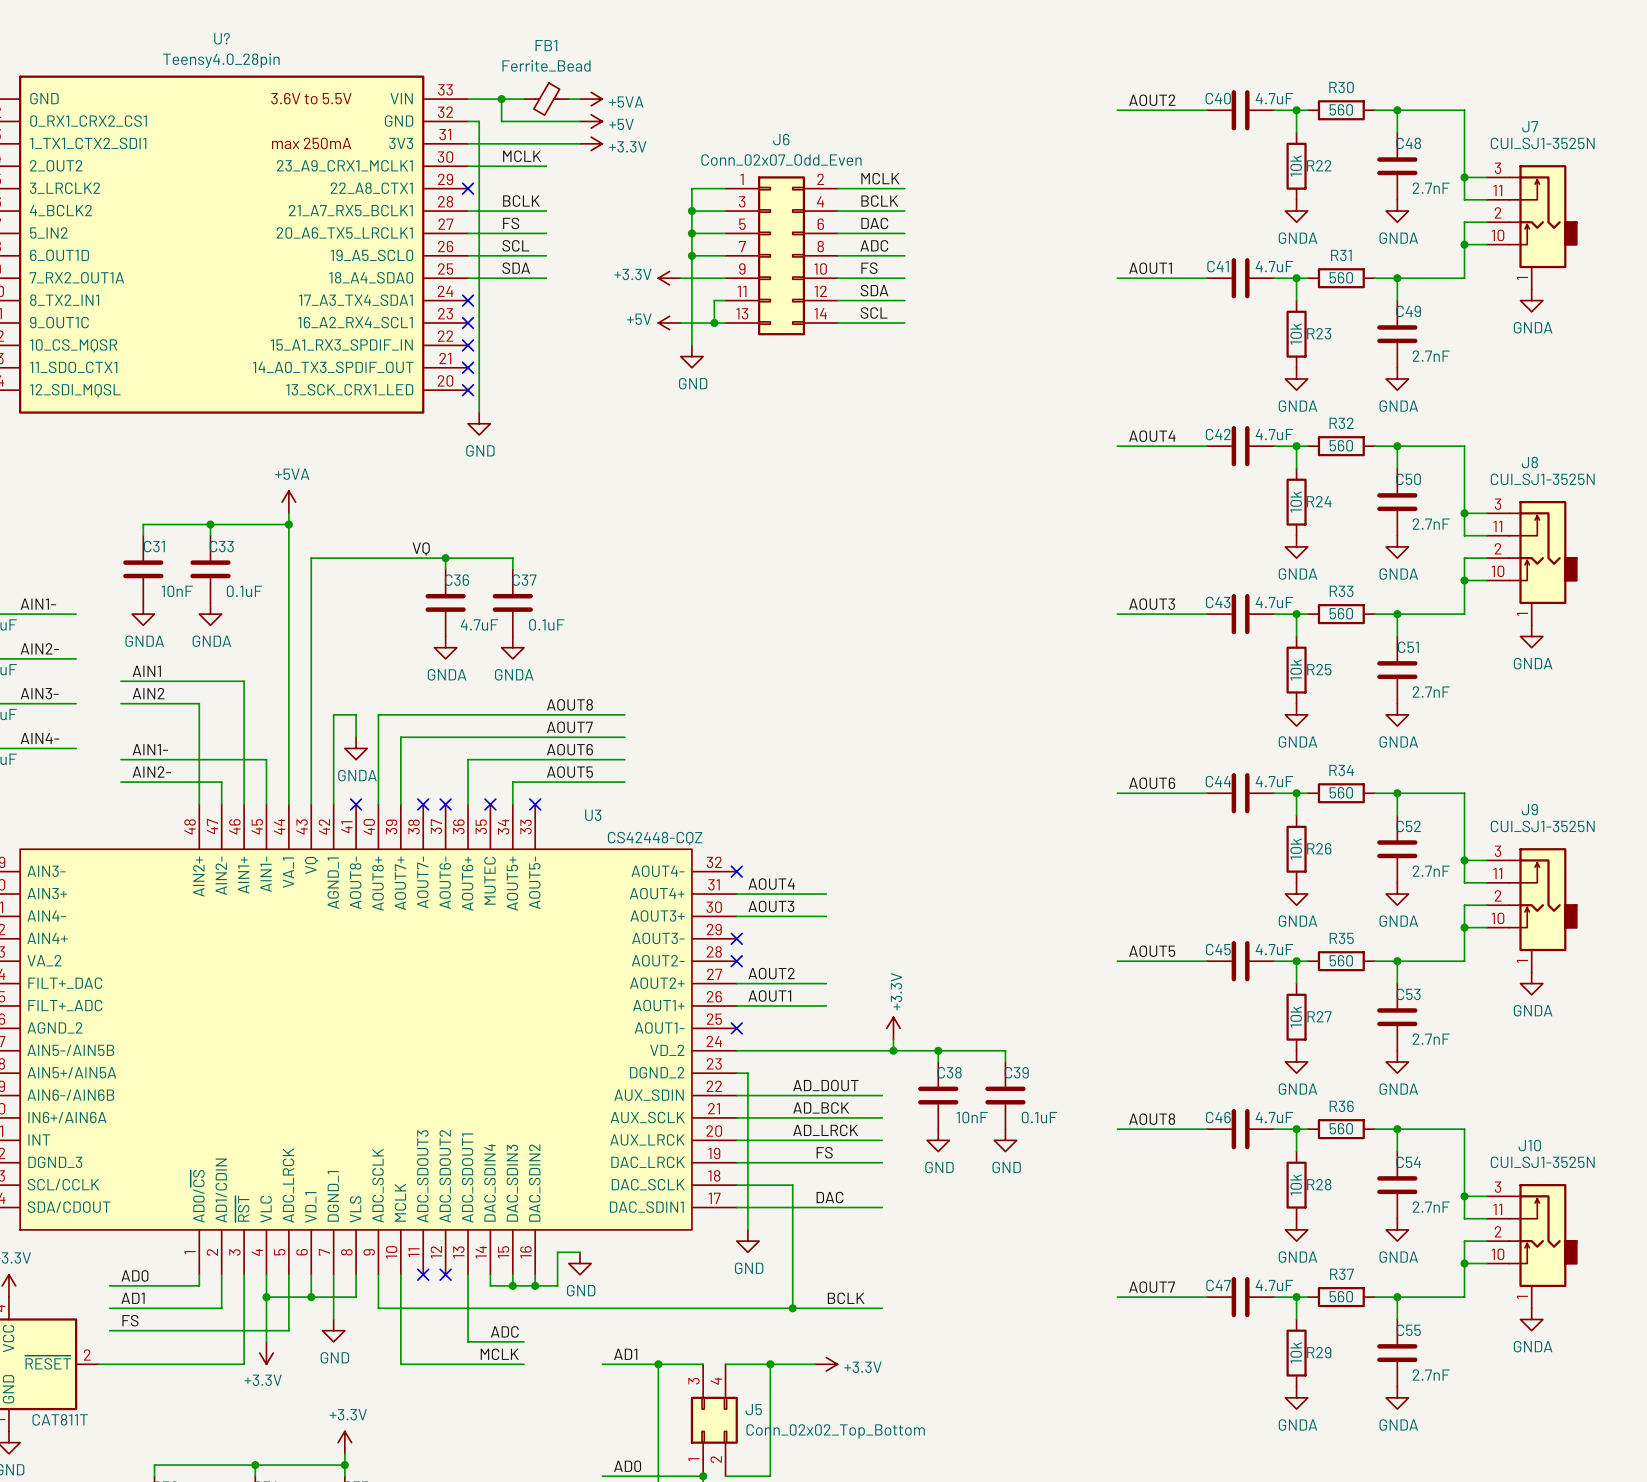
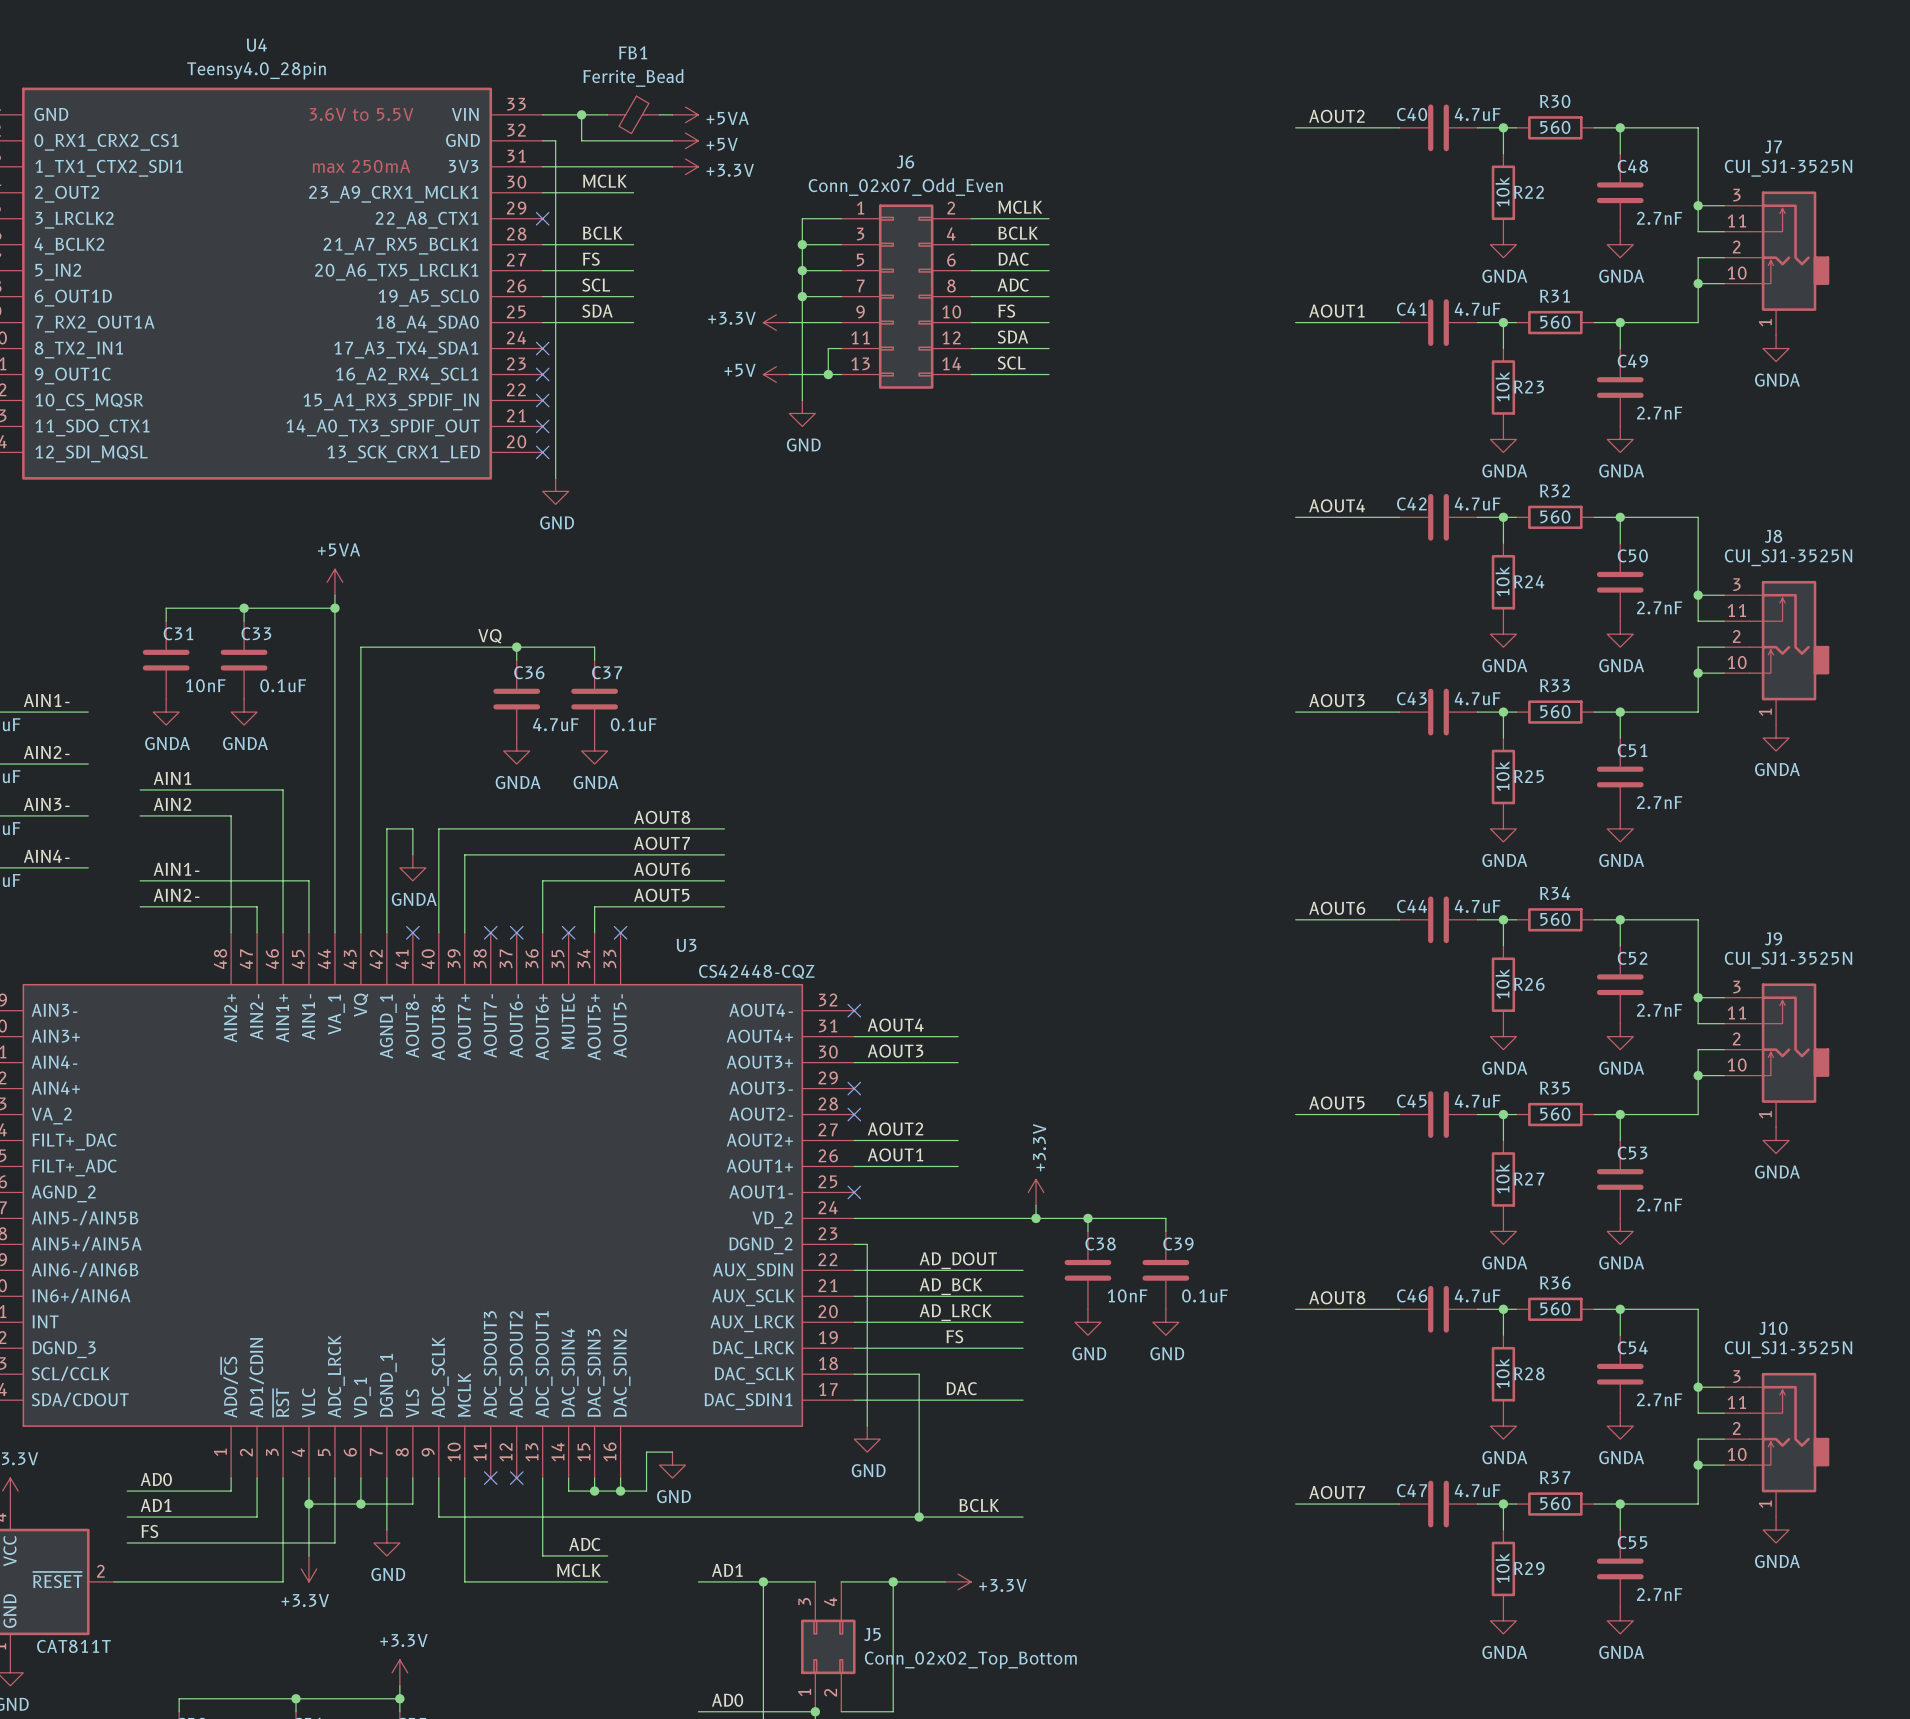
U? name: U? (222, 38) -> U4 (256, 45)

